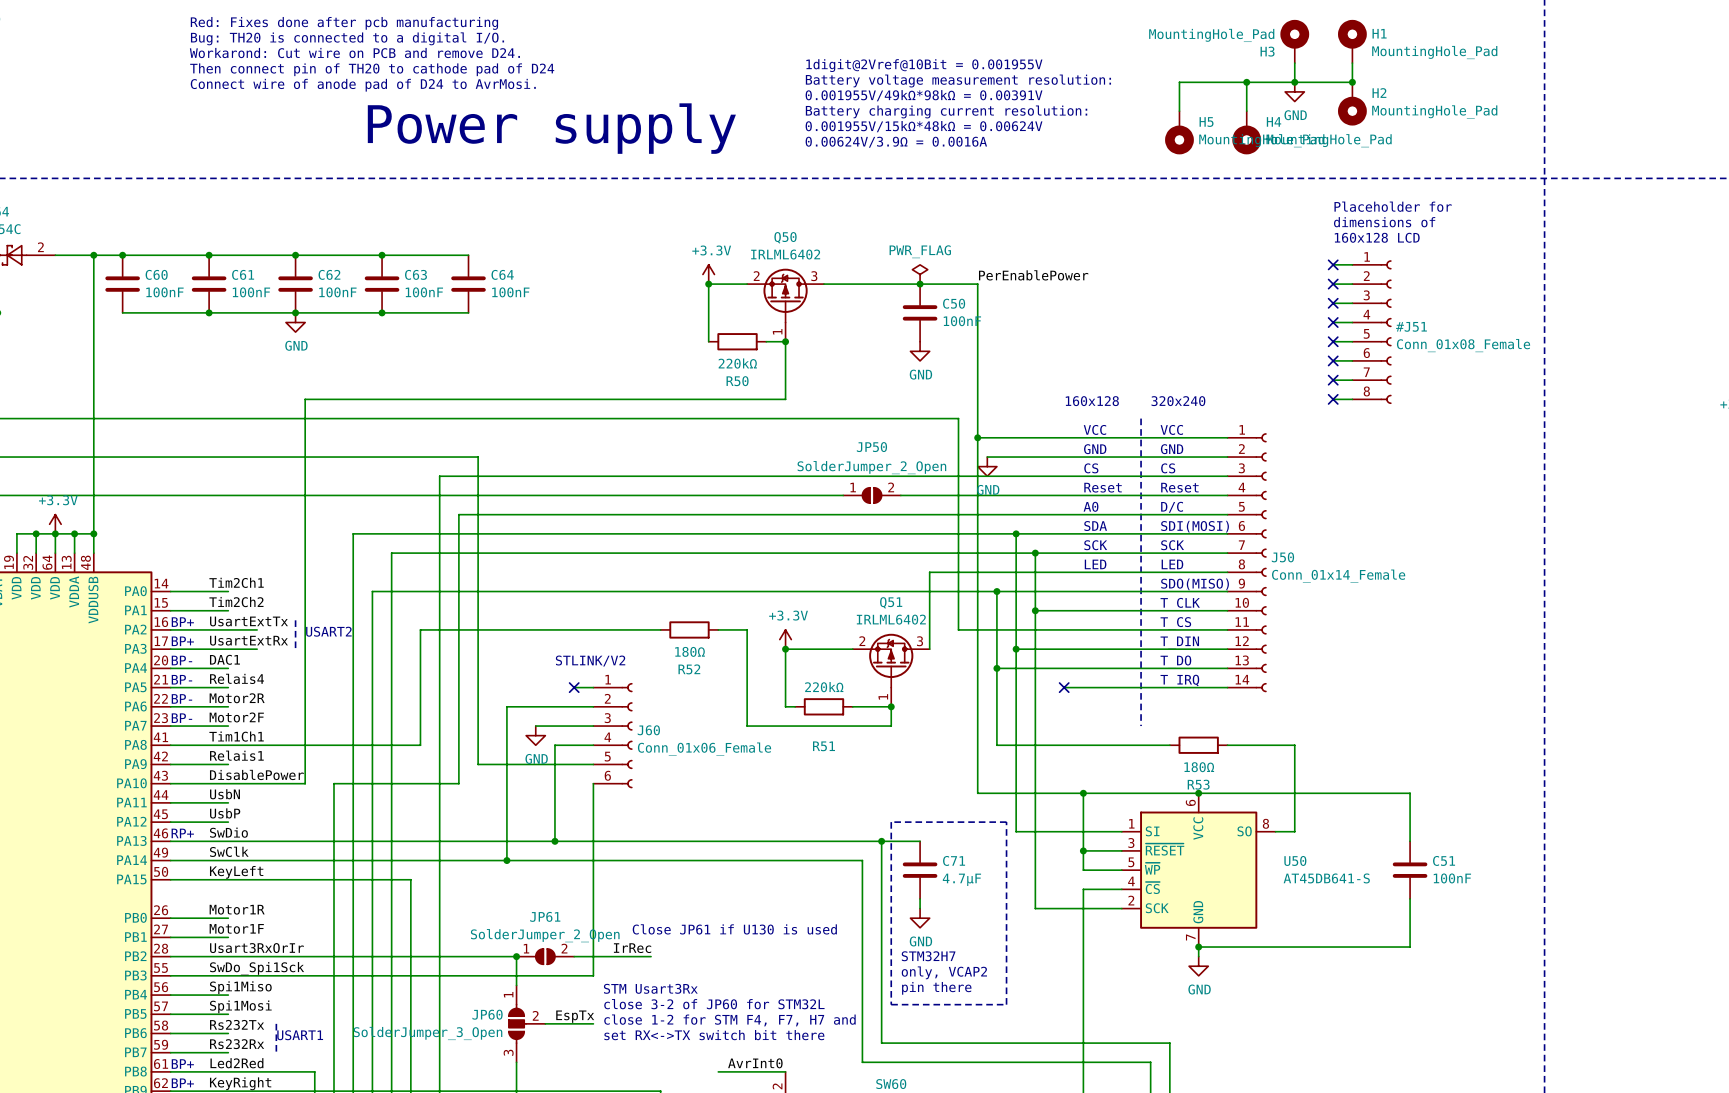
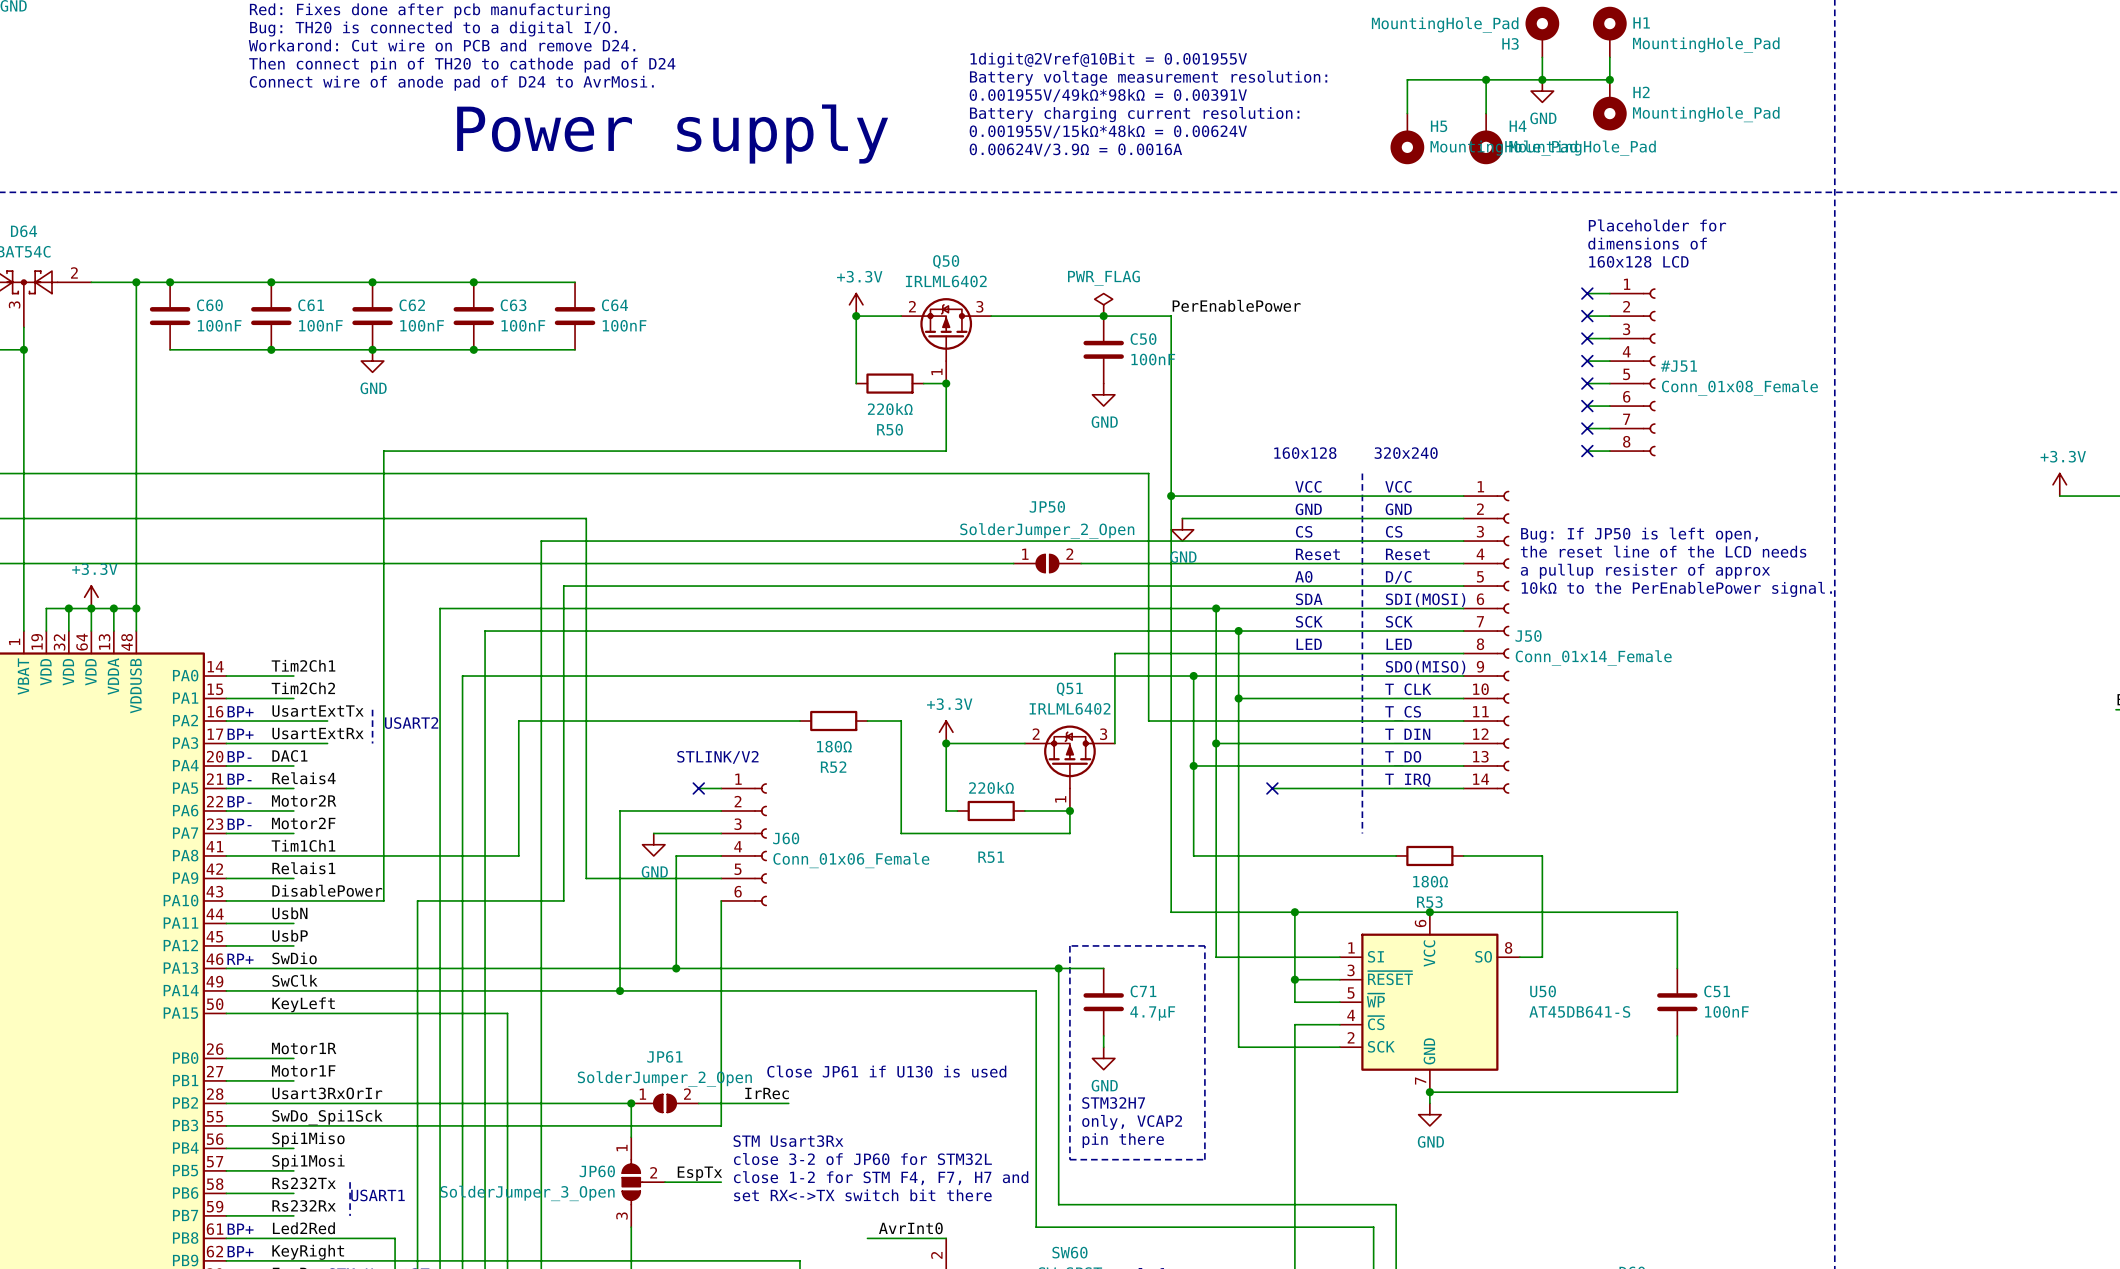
text: none -> Bug: If JP50 is left open, (1639, 535)
text: none -> the reset line of the LCD needs (1663, 551)
text: none -> a pullup resister of approx (1645, 571)
text: none -> 10kΩ to the PerEnablePower signal. (1676, 589)

